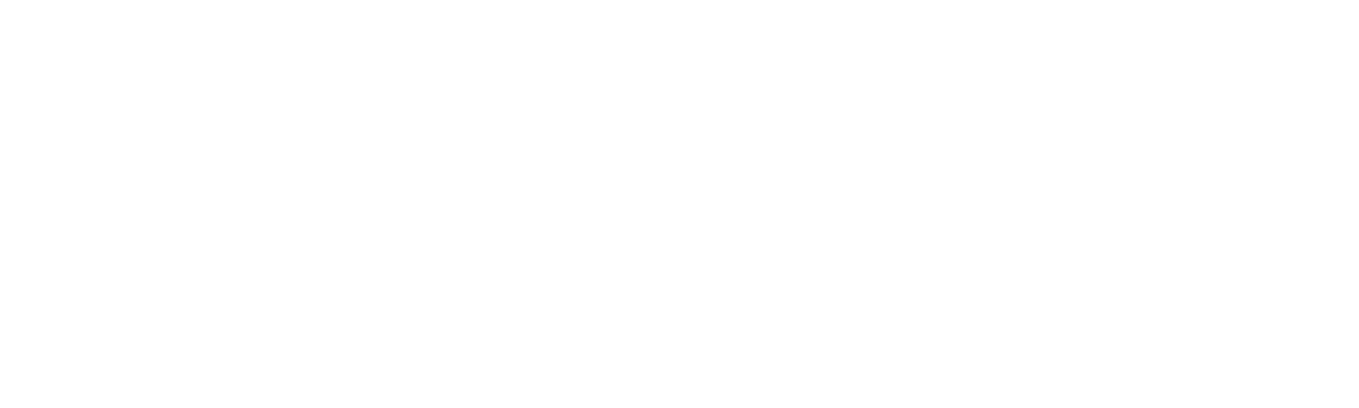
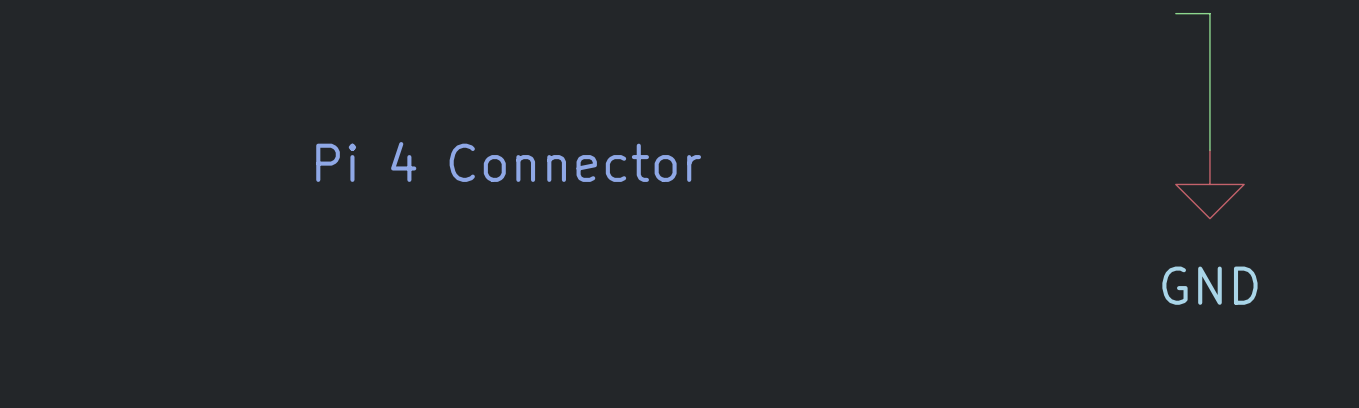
wire: none -> (1175, 13) (1209, 13) (1209, 150)
text: none -> Pi 4 Connector (508, 161)
power symbol: none -> GND (1209, 184)

